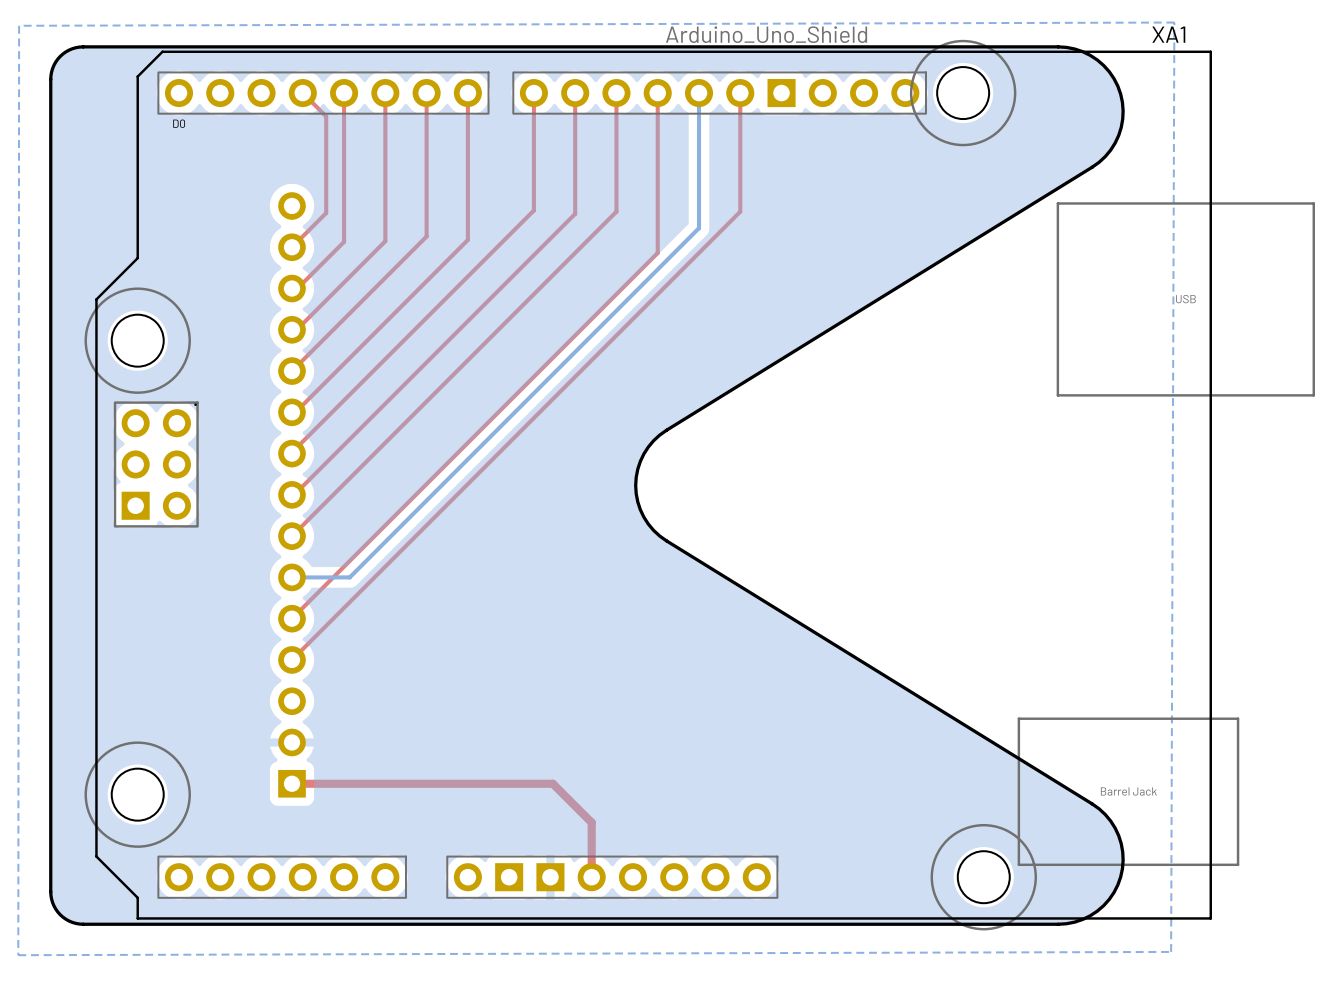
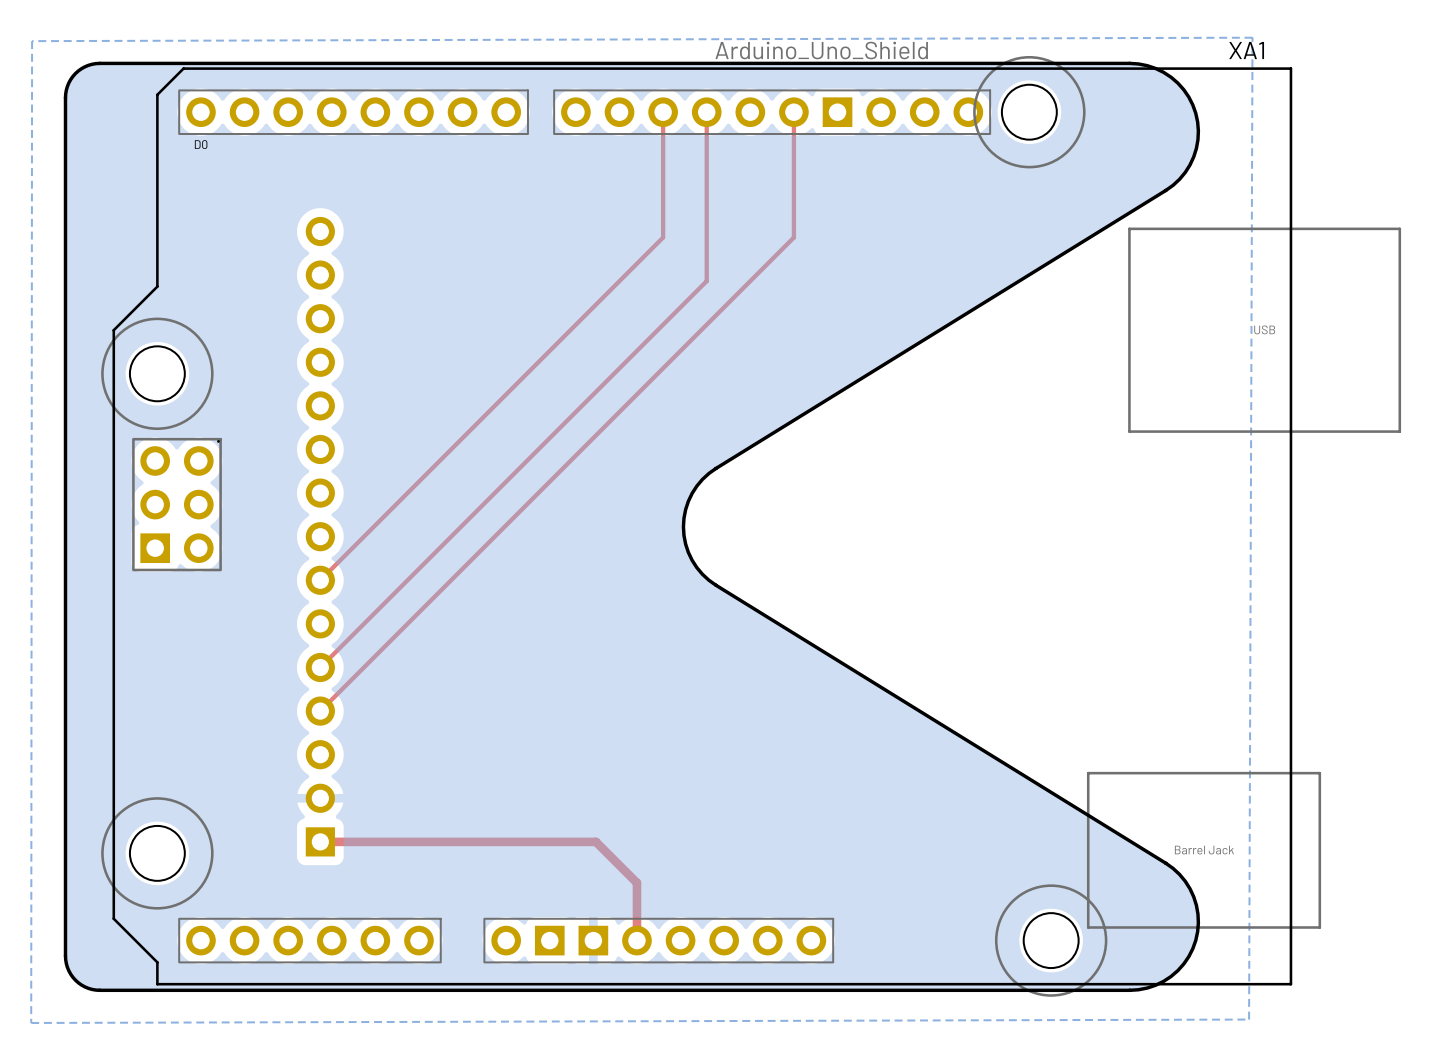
top track: (302, 93) (326, 116) (326, 213) (292, 247) -> none
top track: (344, 93) (344, 241) (297, 288) (292, 288) -> none
top track: (385, 93) (385, 241) (296, 329) (292, 329) -> none
top track: (426, 93) (426, 236) (292, 371) -> none
top track: (467, 93) (467, 239) (295, 412) (292, 412) -> none
top track: (533, 93) (533, 210) (292, 453) -> none
top track: (575, 93) (575, 213) (294, 494) (292, 494) -> none
bottom track: (699, 93) (699, 228) (349, 577) (292, 577) -> none

